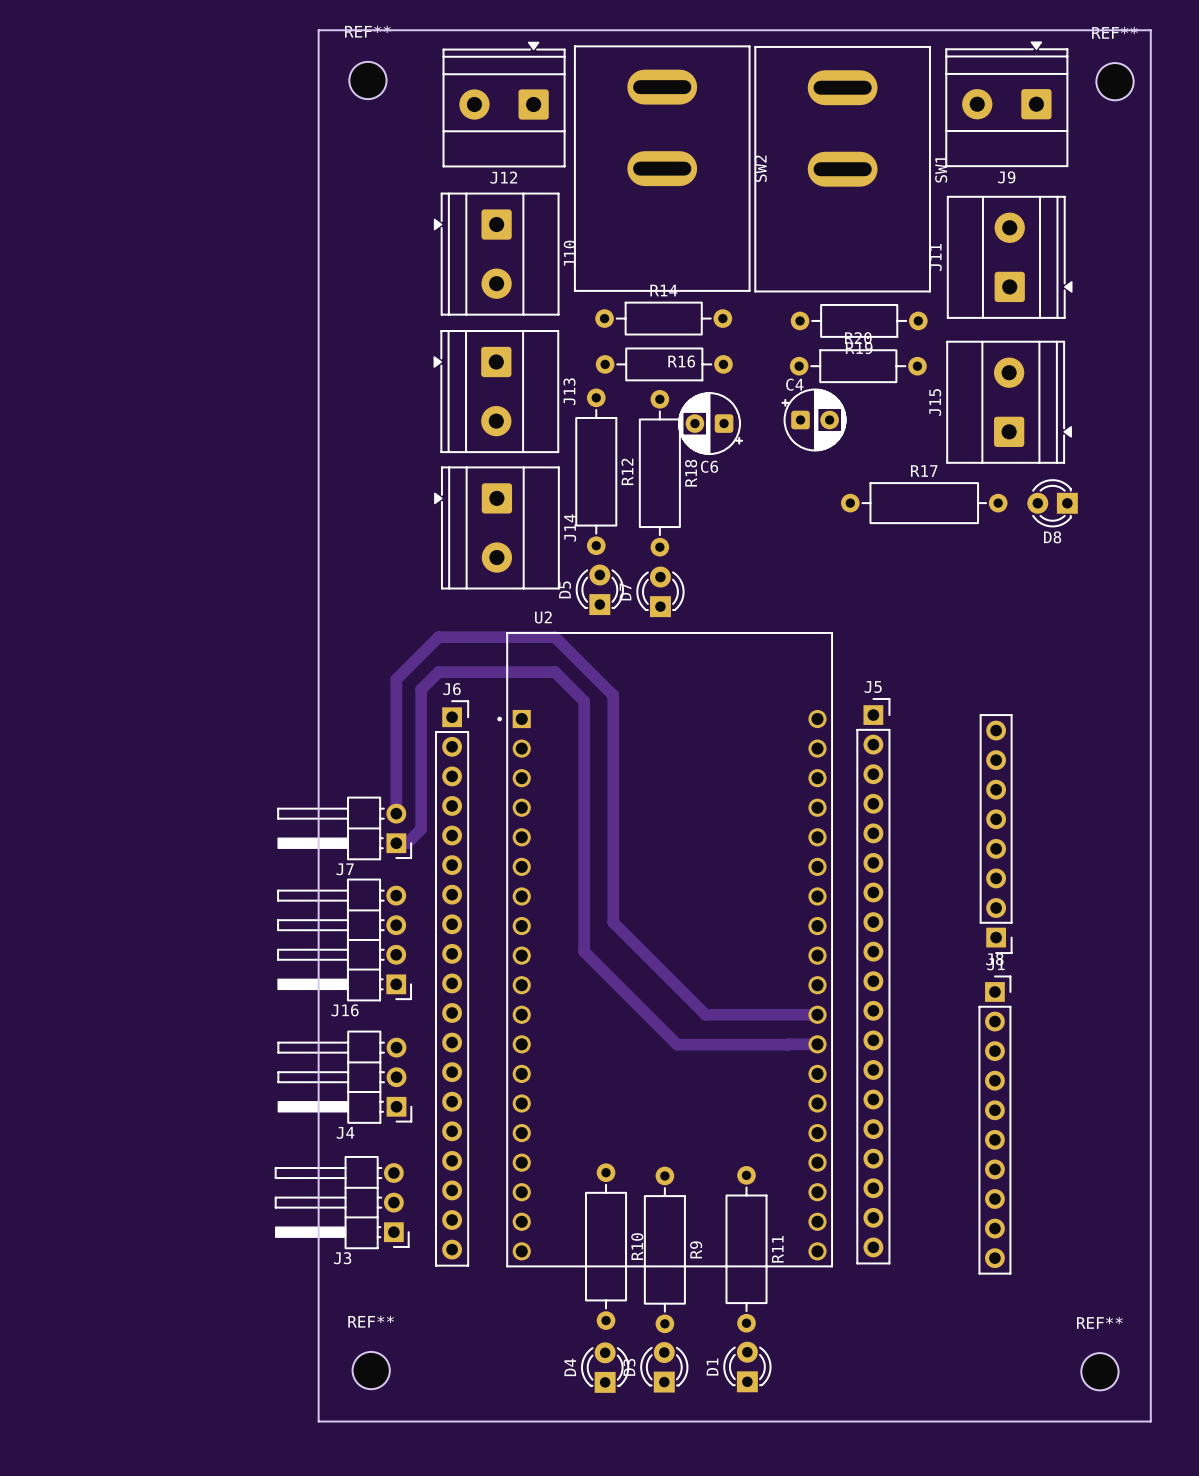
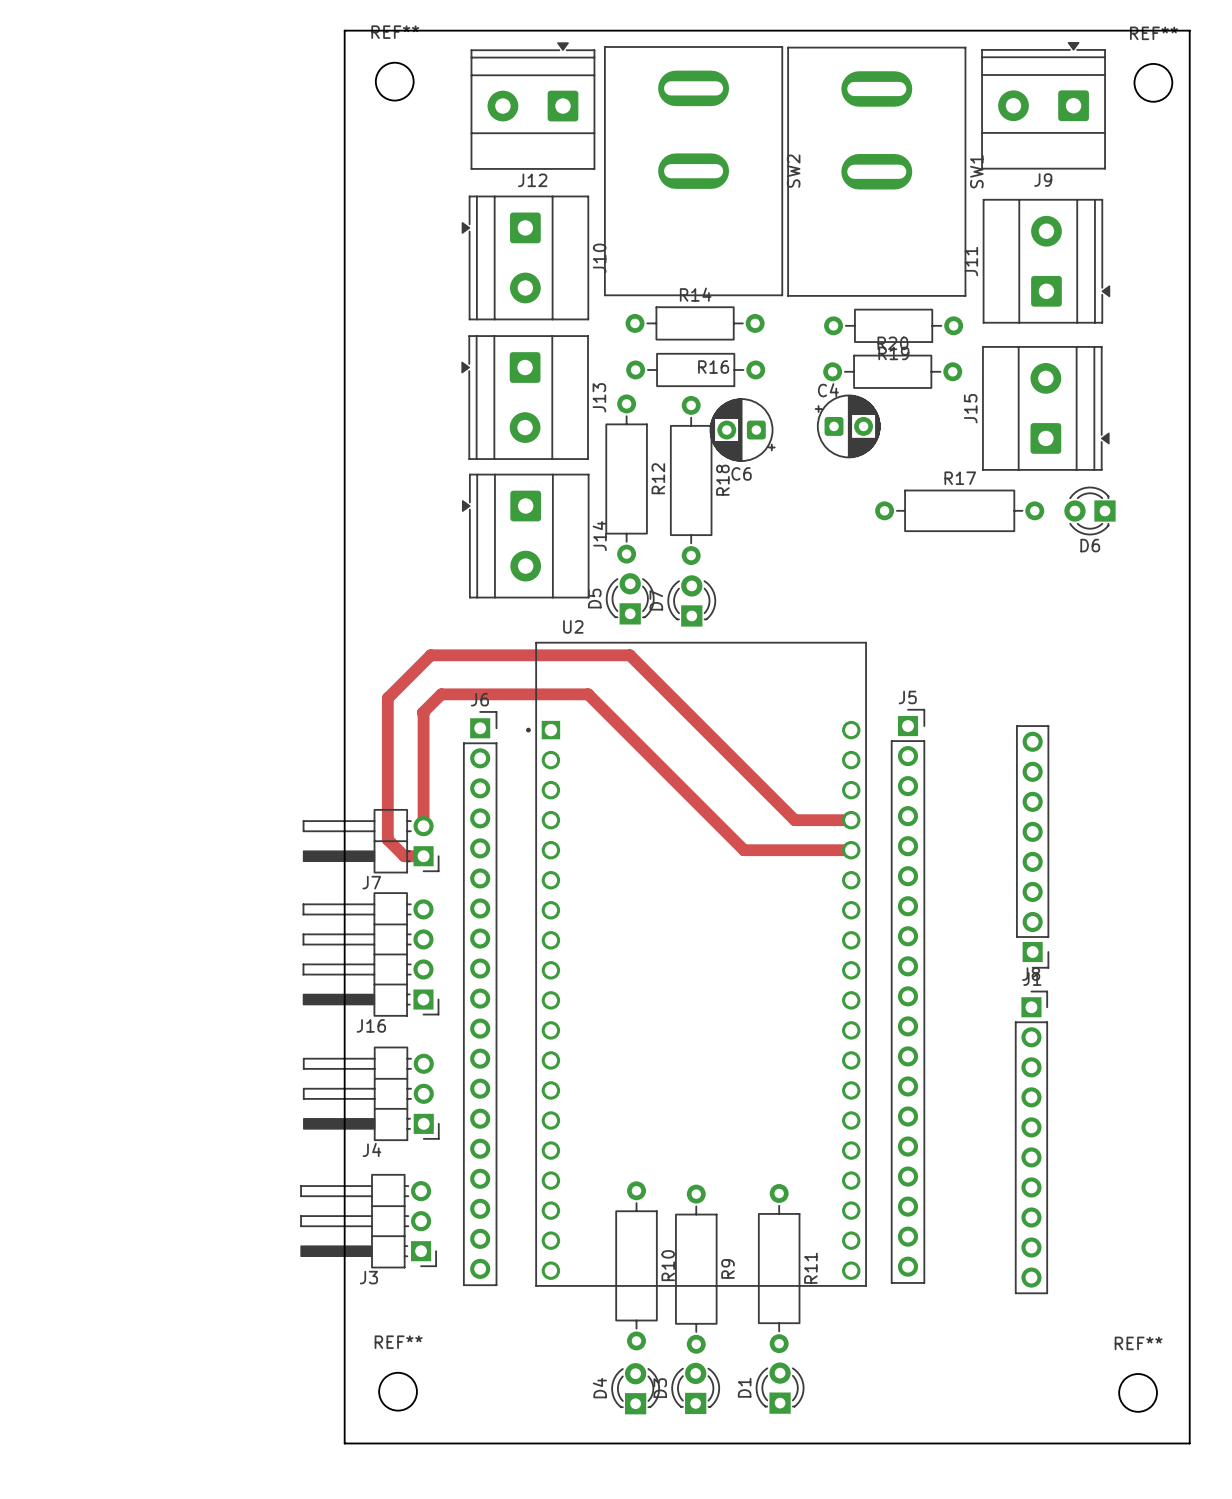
D8 name: D8 (1052, 537) -> D6 (1090, 545)
track: (396, 702) (396, 679) (438, 637) (555, 637) (613, 695) (613, 922) (705, 1014) (817, 1014) -> (423, 713) (441, 694) (588, 694) (744, 850) (851, 850)
track: (396, 843) (407, 843) (421, 829) (421, 689) (438, 672) (555, 672) (584, 701) (584, 951) (677, 1044) (817, 1044) -> (423, 856) (404, 856) (387, 839) (387, 698) (430, 655) (629, 655) (794, 820) (851, 820)

